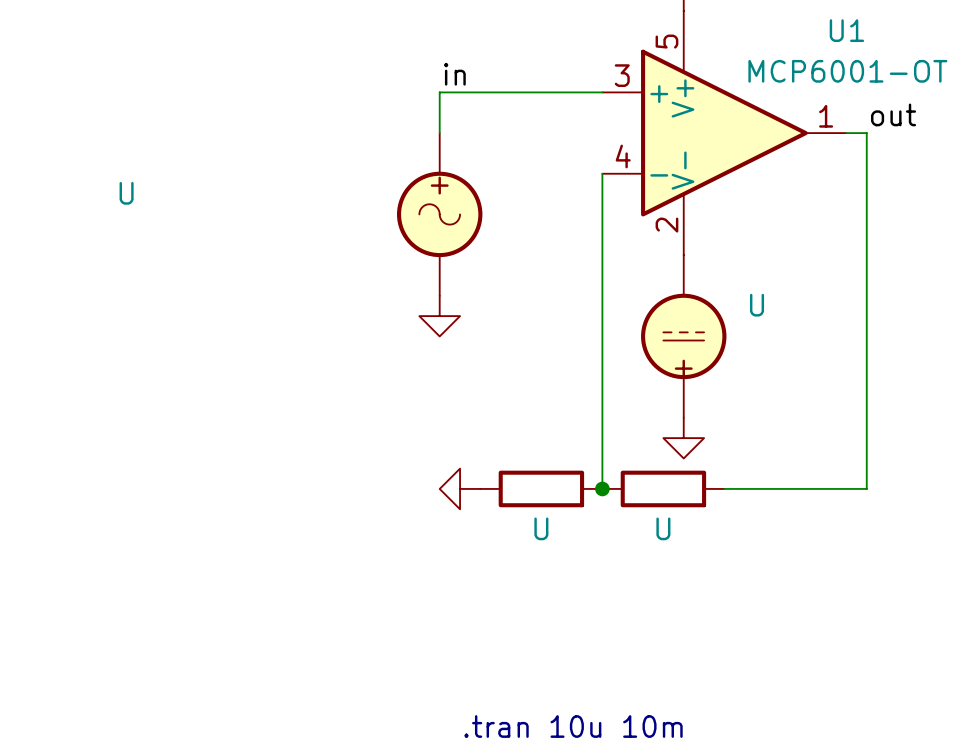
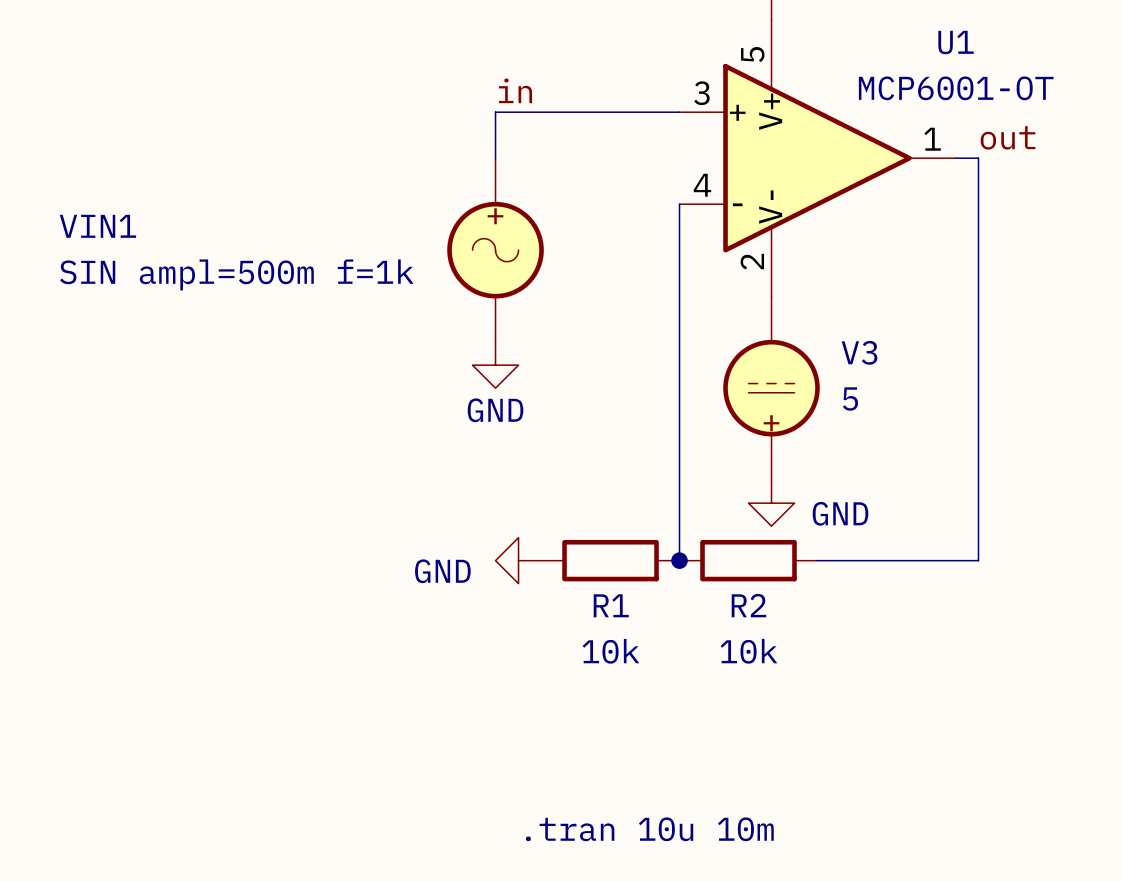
U name: U (126, 193) -> VIN1 (97, 226)
U value: none -> SIN ampl=500m f=1k (236, 274)
U name: U (757, 305) -> V3 (859, 352)
U value: none -> 5 (850, 399)
power symbol text: none -> GND (495, 410)
power symbol text: none -> GND (840, 513)
power symbol text: none -> GND (442, 571)
U name: U (541, 528) -> R1 (611, 605)
U name: U (663, 528) -> R2 (748, 605)
U value: none -> 10k (610, 651)
U value: none -> 10k (748, 651)

